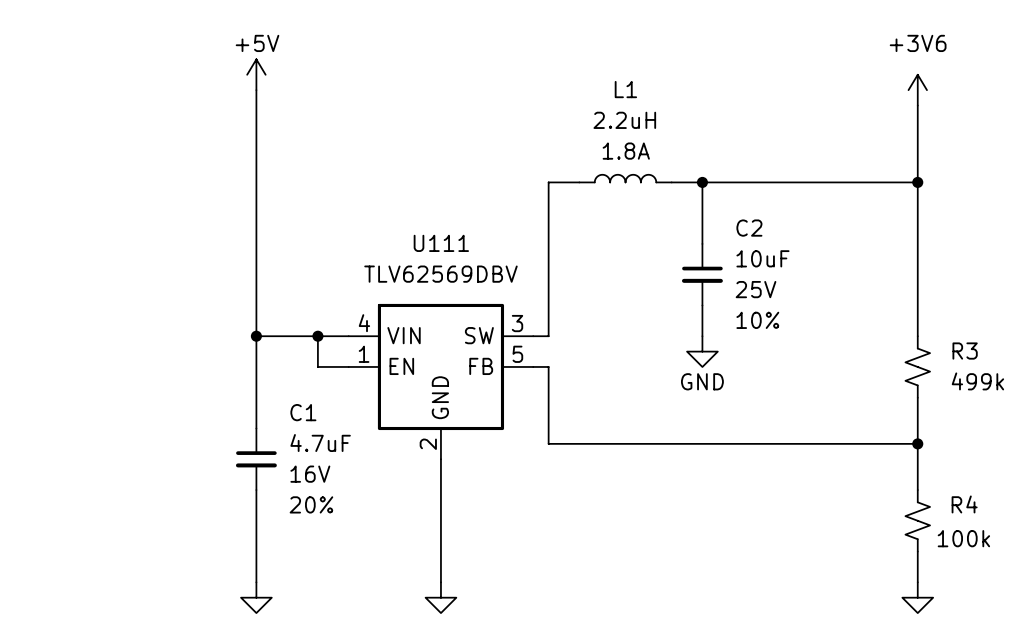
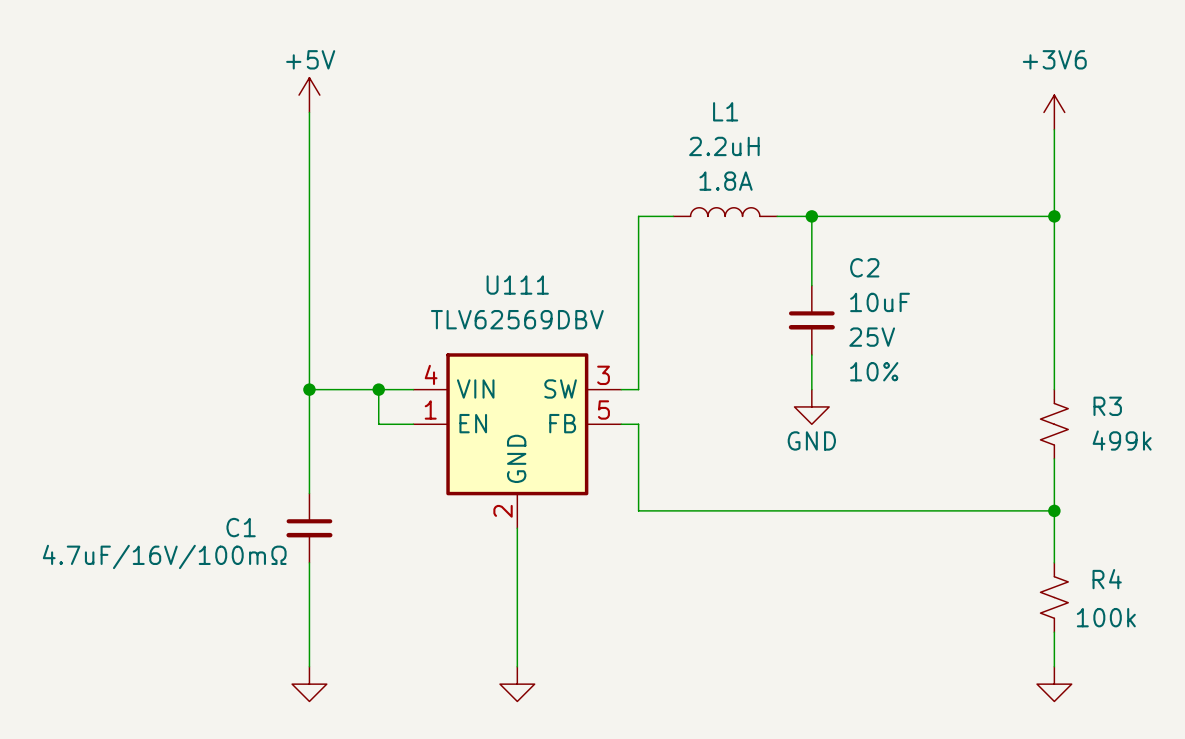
C1 name position: C1 (303, 412) -> C1 (241, 527)
C1 value: 4.7uF (320, 443) -> none
C1 text: 16V (310, 474) -> none
C1 text: none -> 4.7uF/16V/100mΩ (164, 556)
C1 text: 20% (311, 504) -> none

